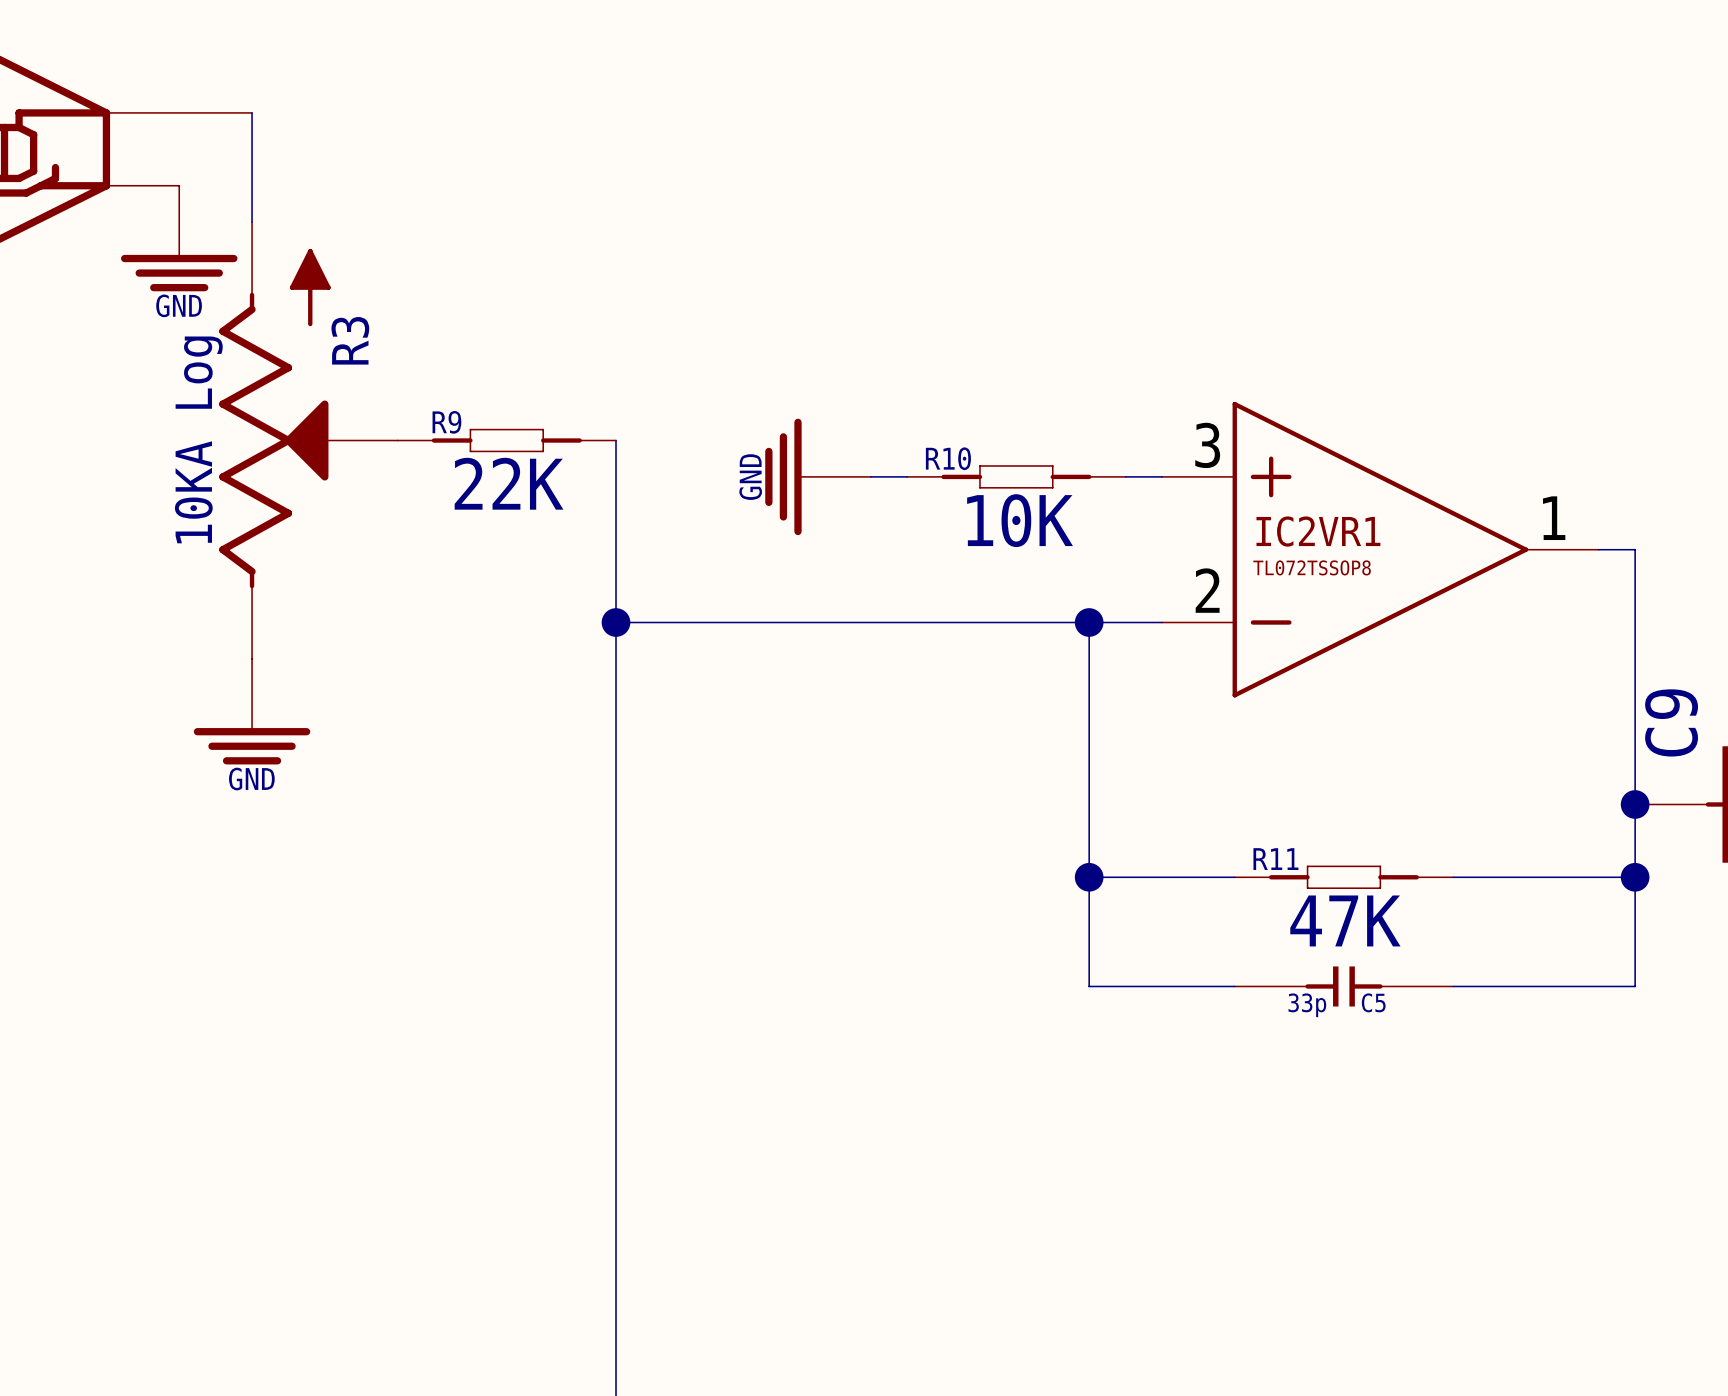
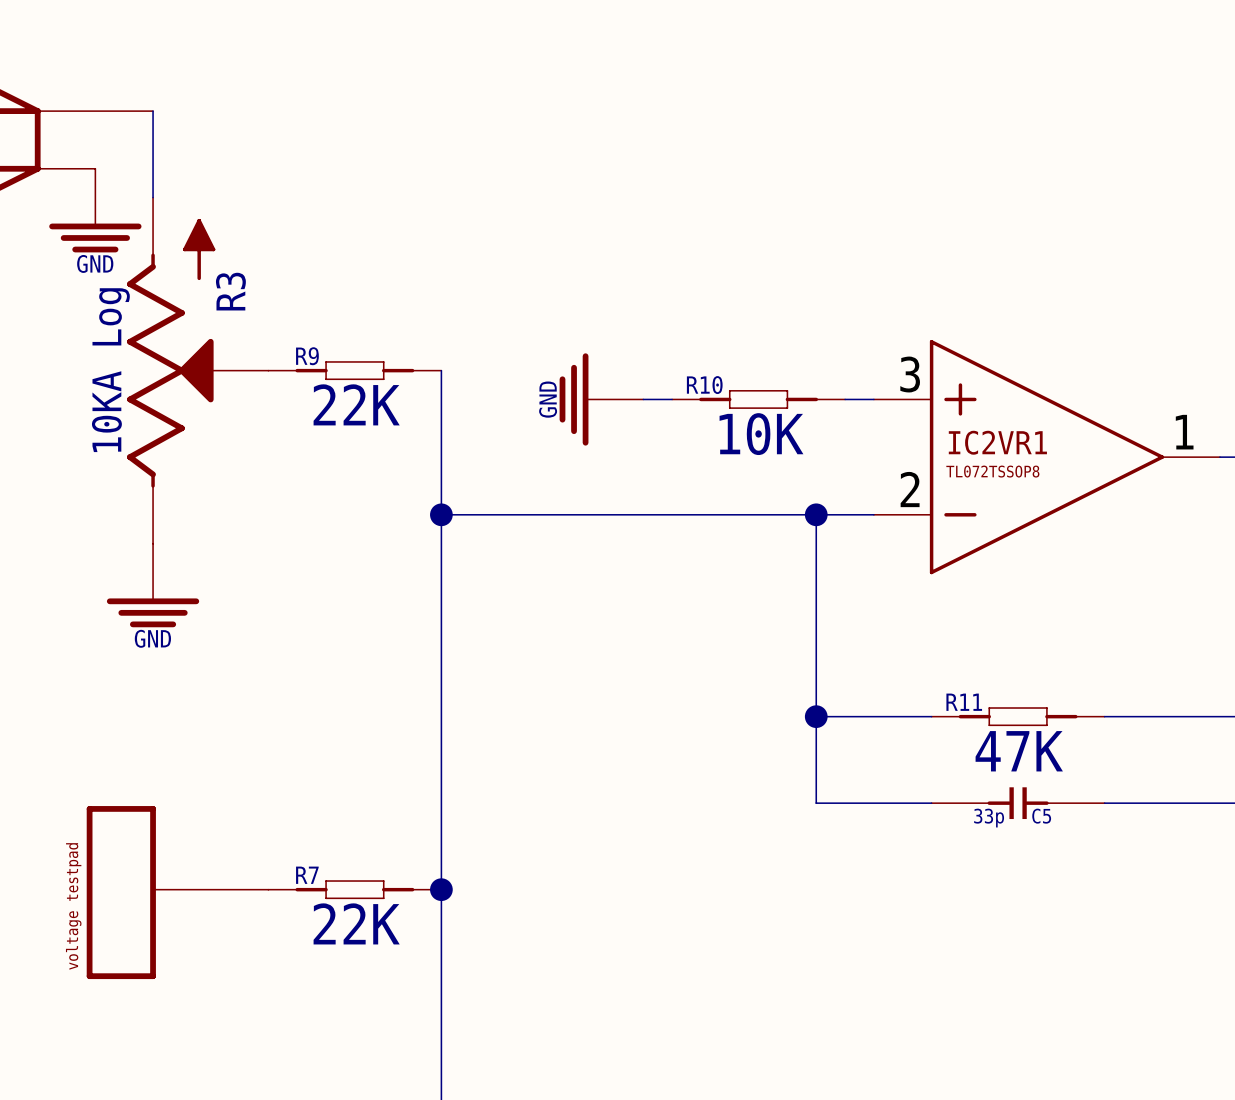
R7: none -> 22K (354, 889)
junction: none -> (441, 889)
part: none -> (177, 892)

